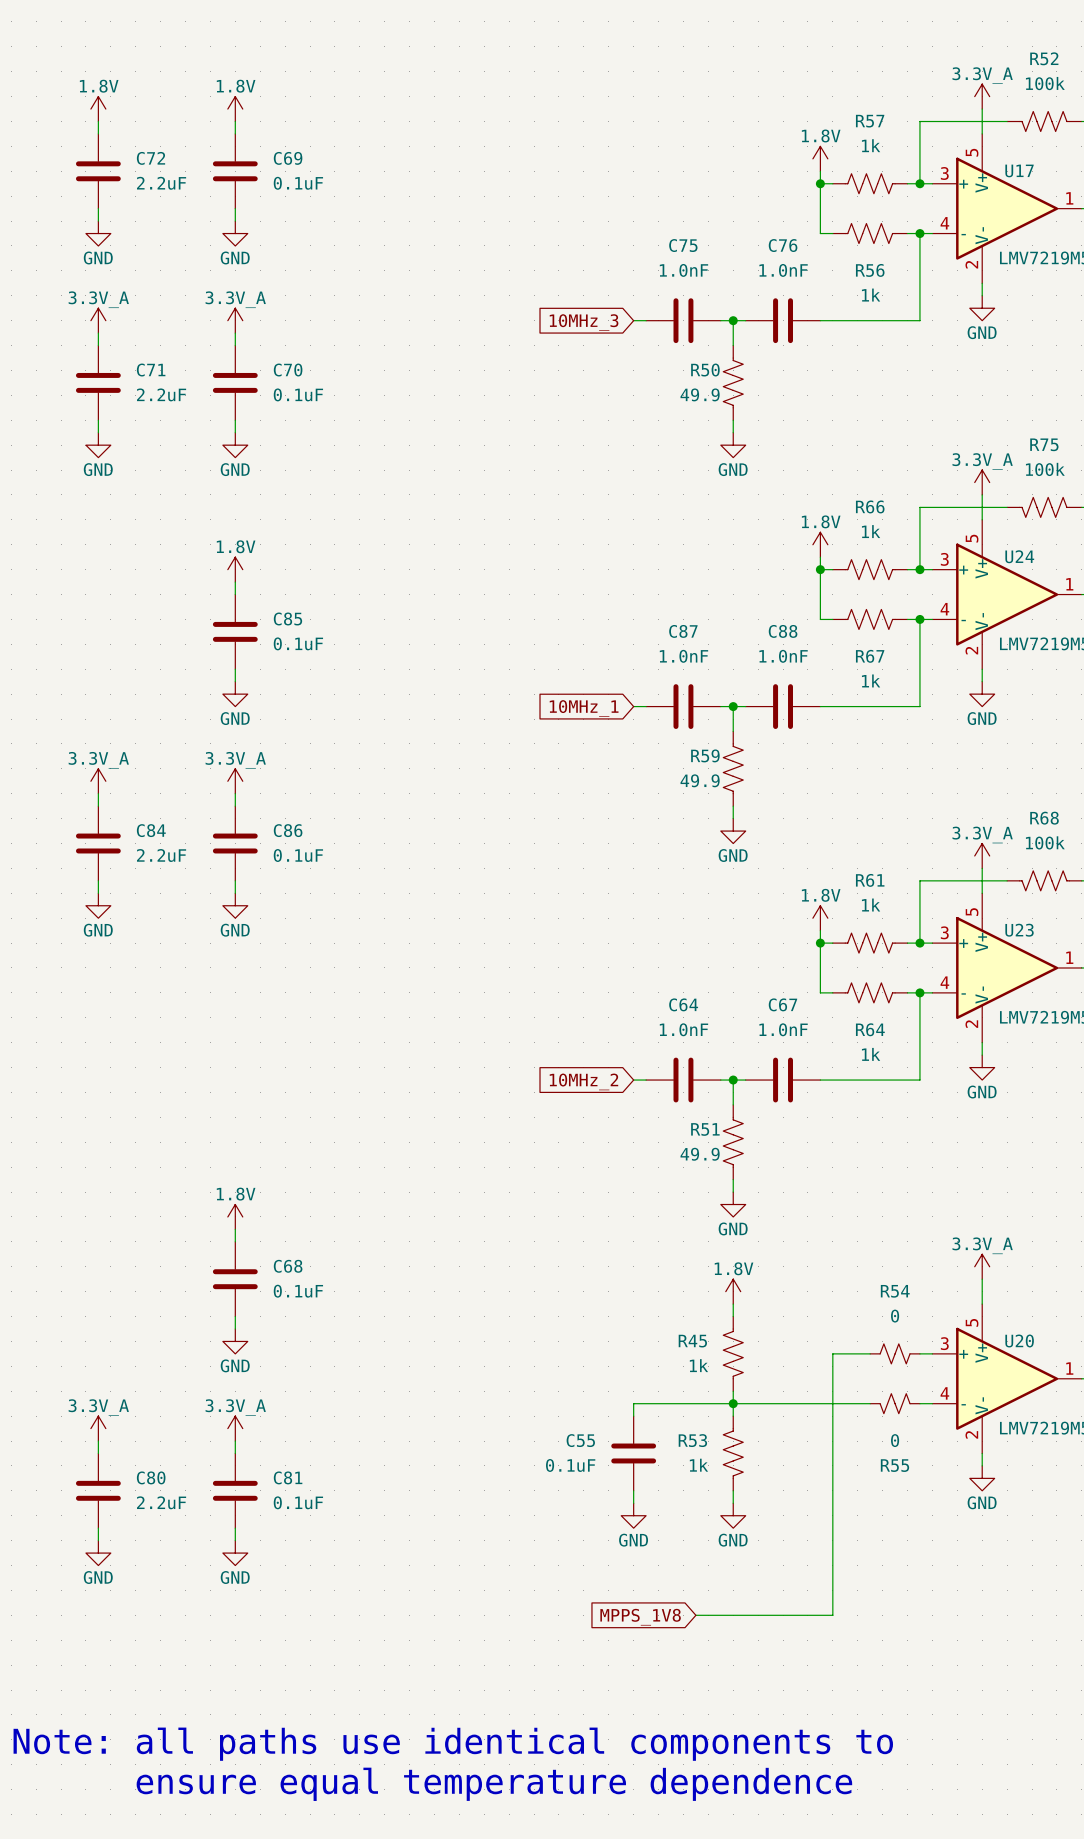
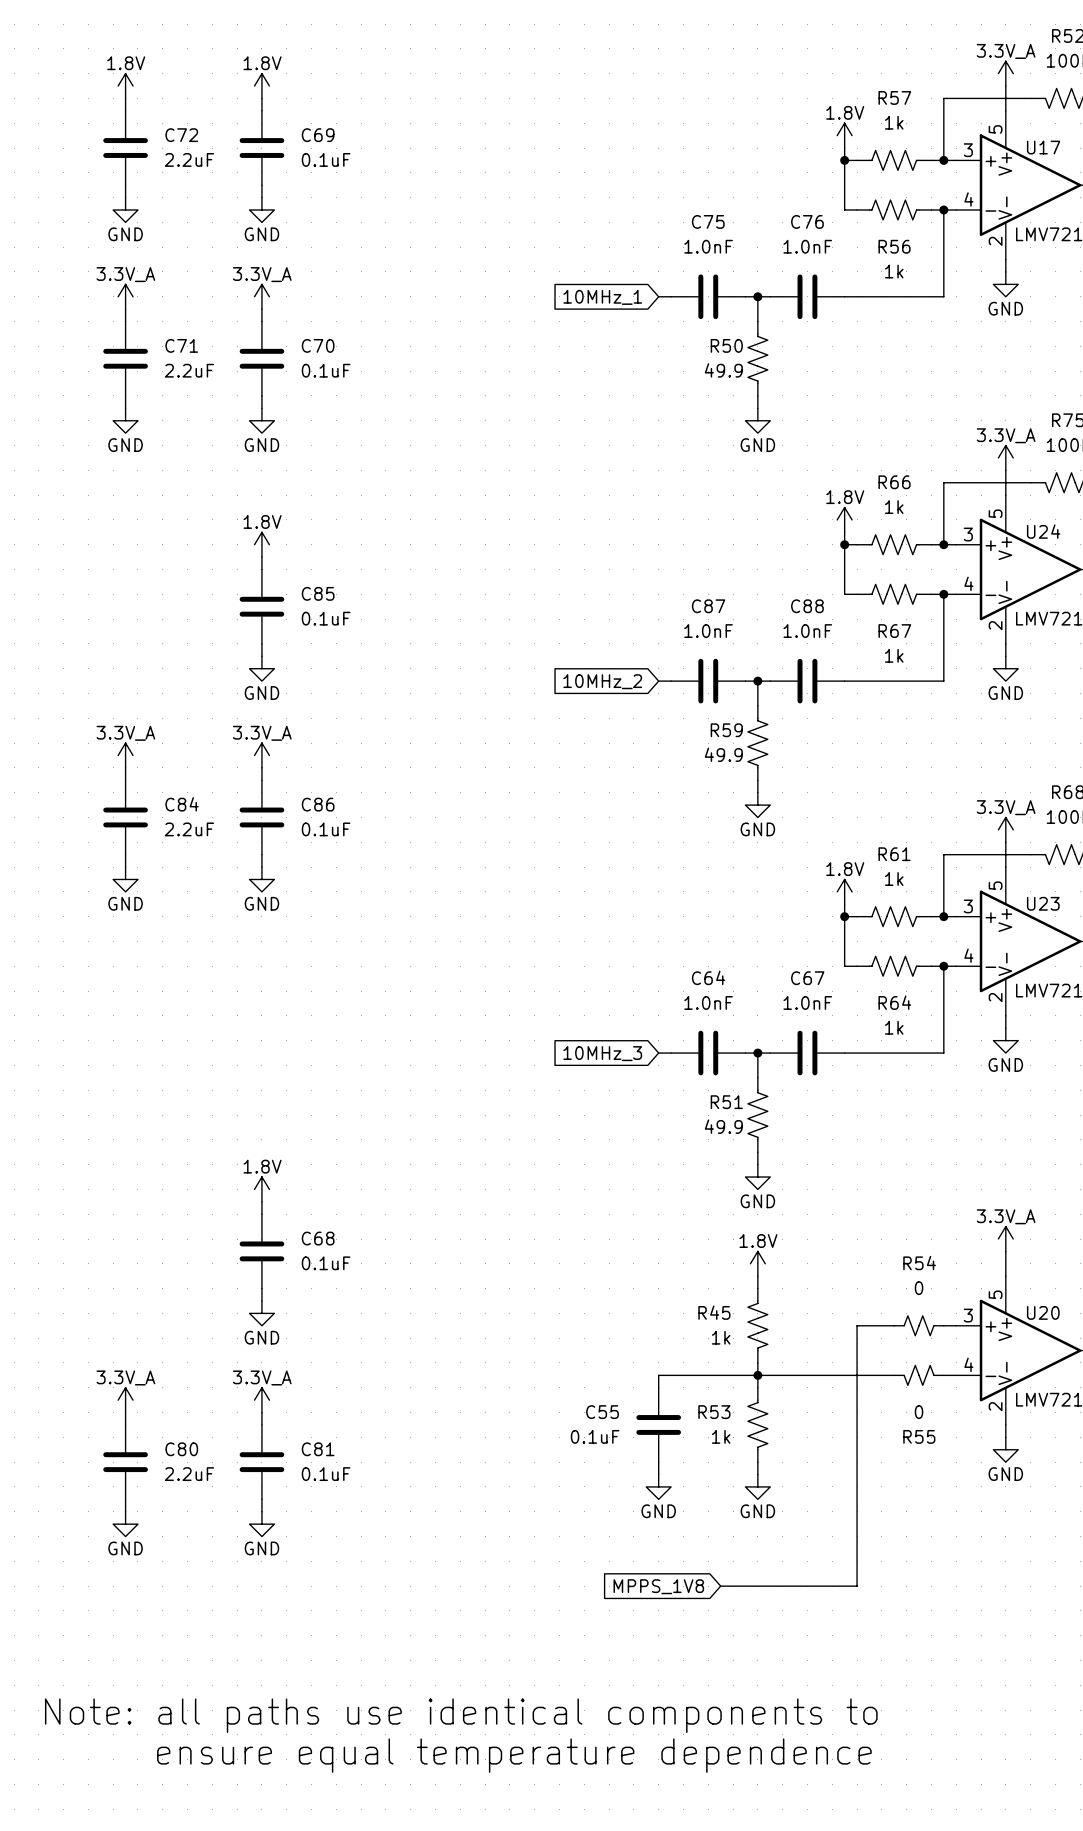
global label: 10MHz_3 (584, 322) -> 10MHz_1 (602, 297)
global label: 10MHz_1 (584, 708) -> 10MHz_2 (602, 681)
global label: 10MHz_2 (583, 1081) -> 10MHz_3 (602, 1053)

